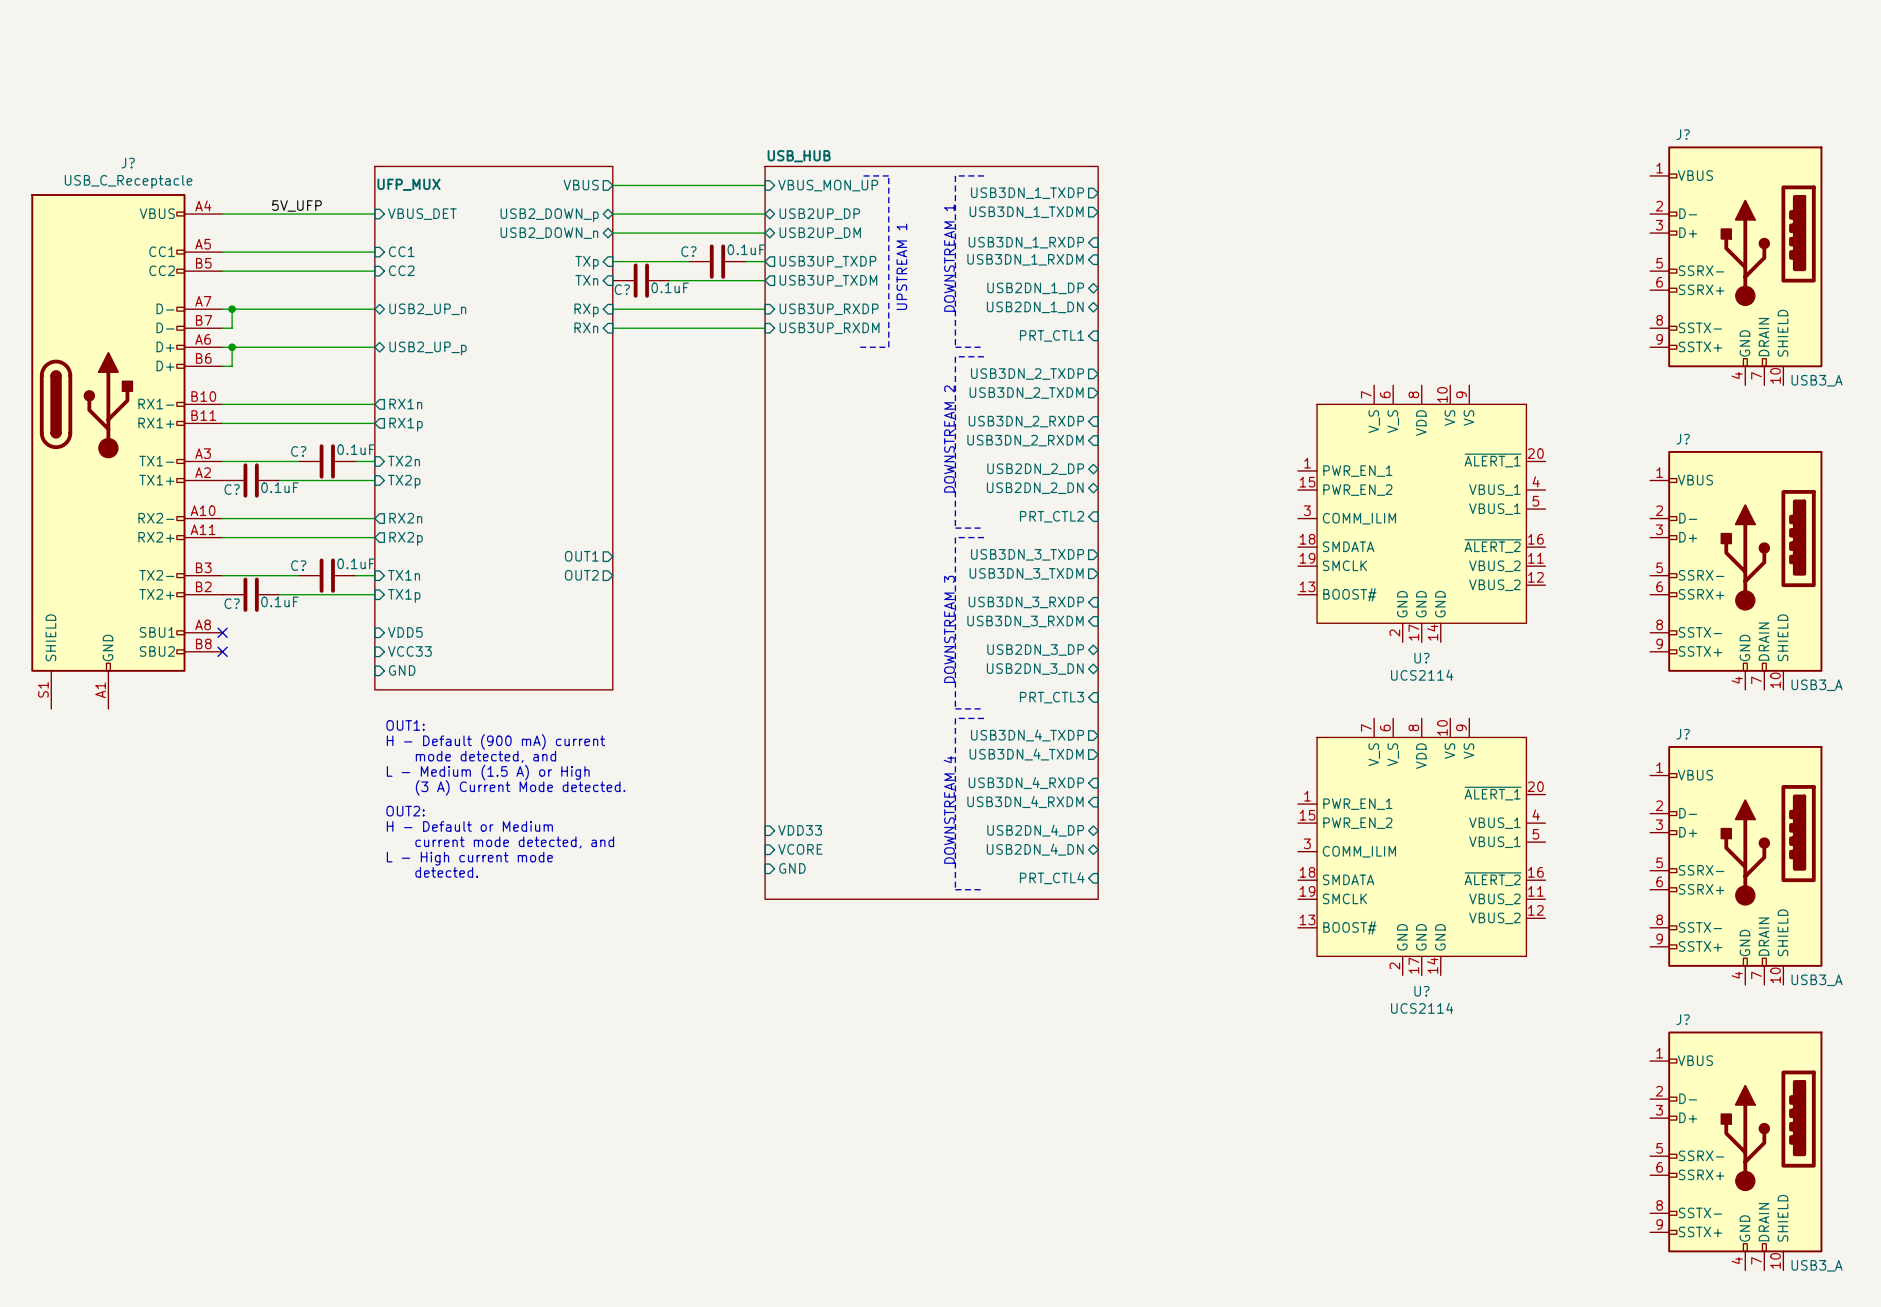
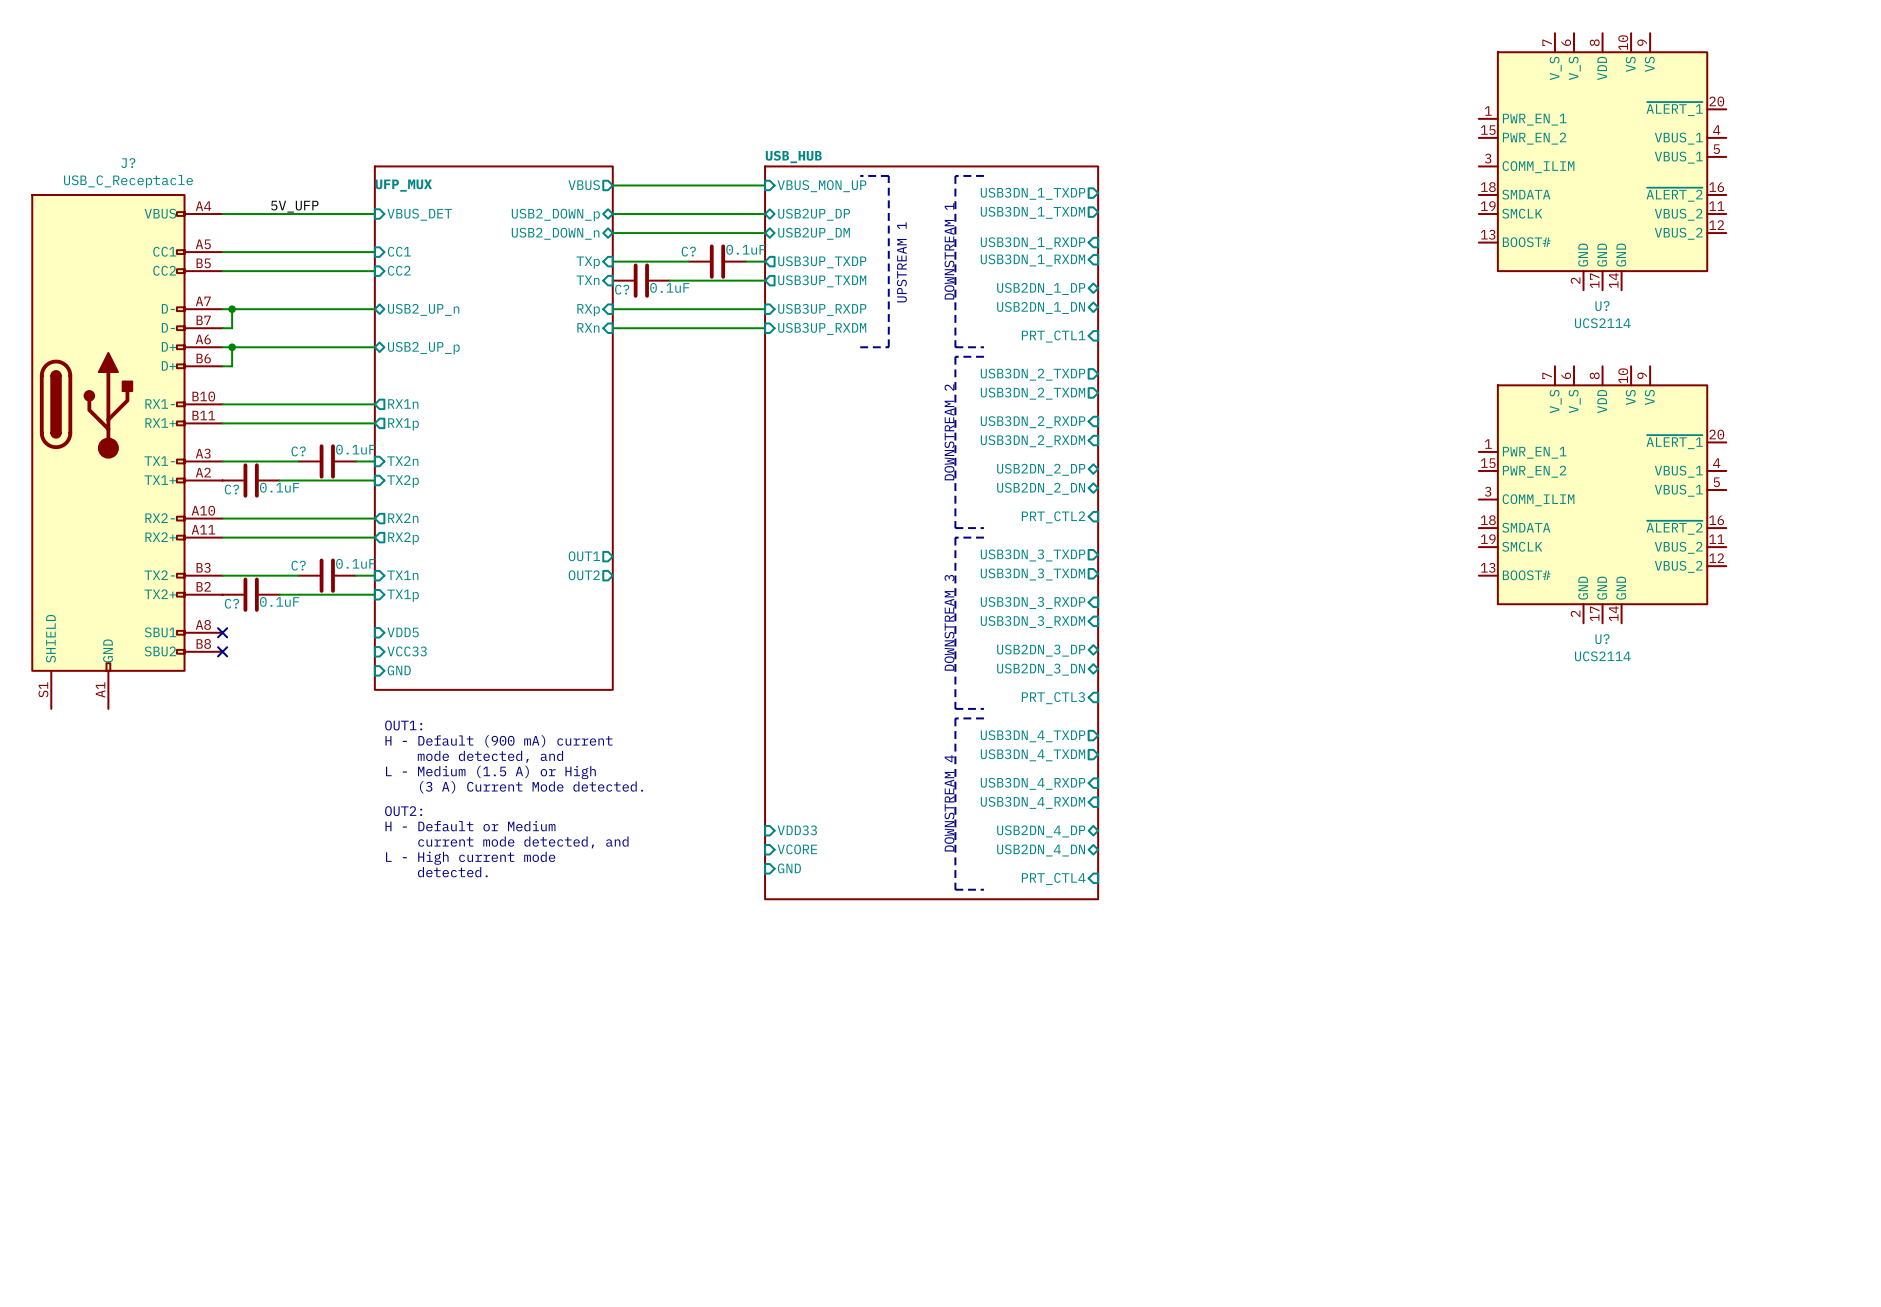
U?: none -> UCS2114 (1602, 161)
J?: USB3_A (1736, 265) -> none
U? position: (1421, 513) -> (1602, 494)
J?: USB3_A (1736, 570) -> none
U?: UCS2114 (1421, 846) -> none
J?: USB3_A (1736, 865) -> none
J?: USB3_A (1736, 1150) -> none

